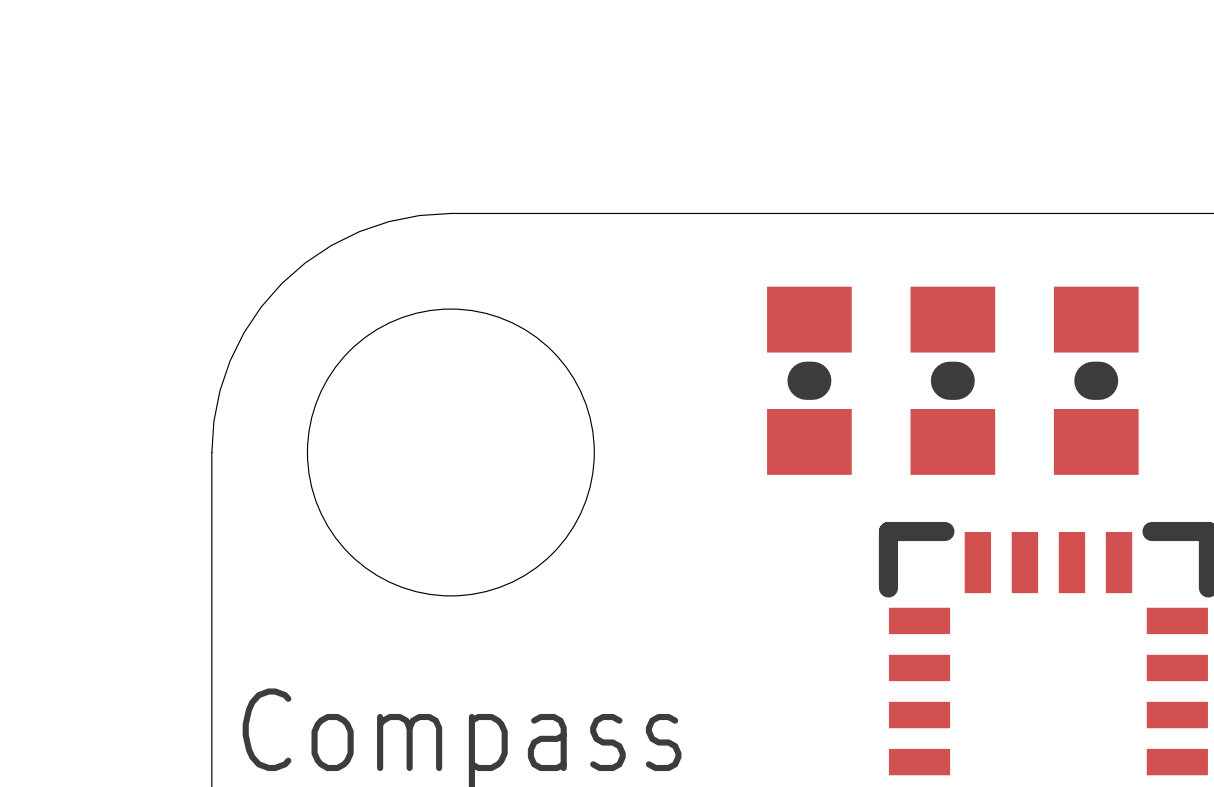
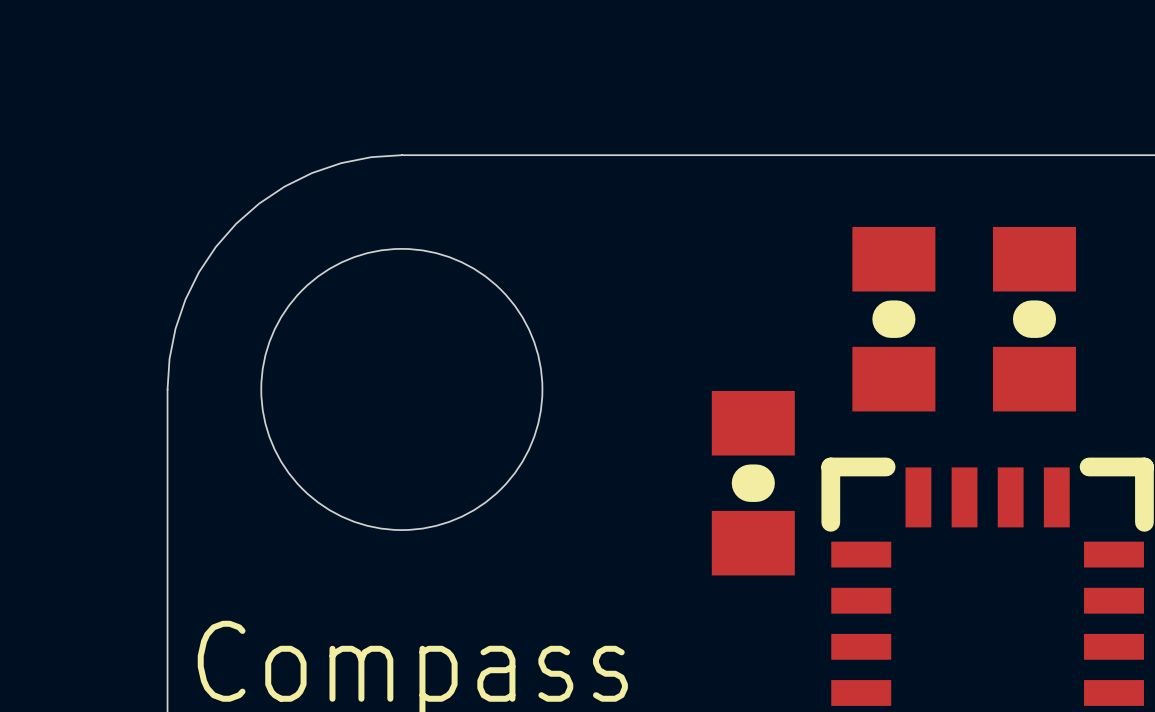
part position: (809, 380) -> (753, 483)

